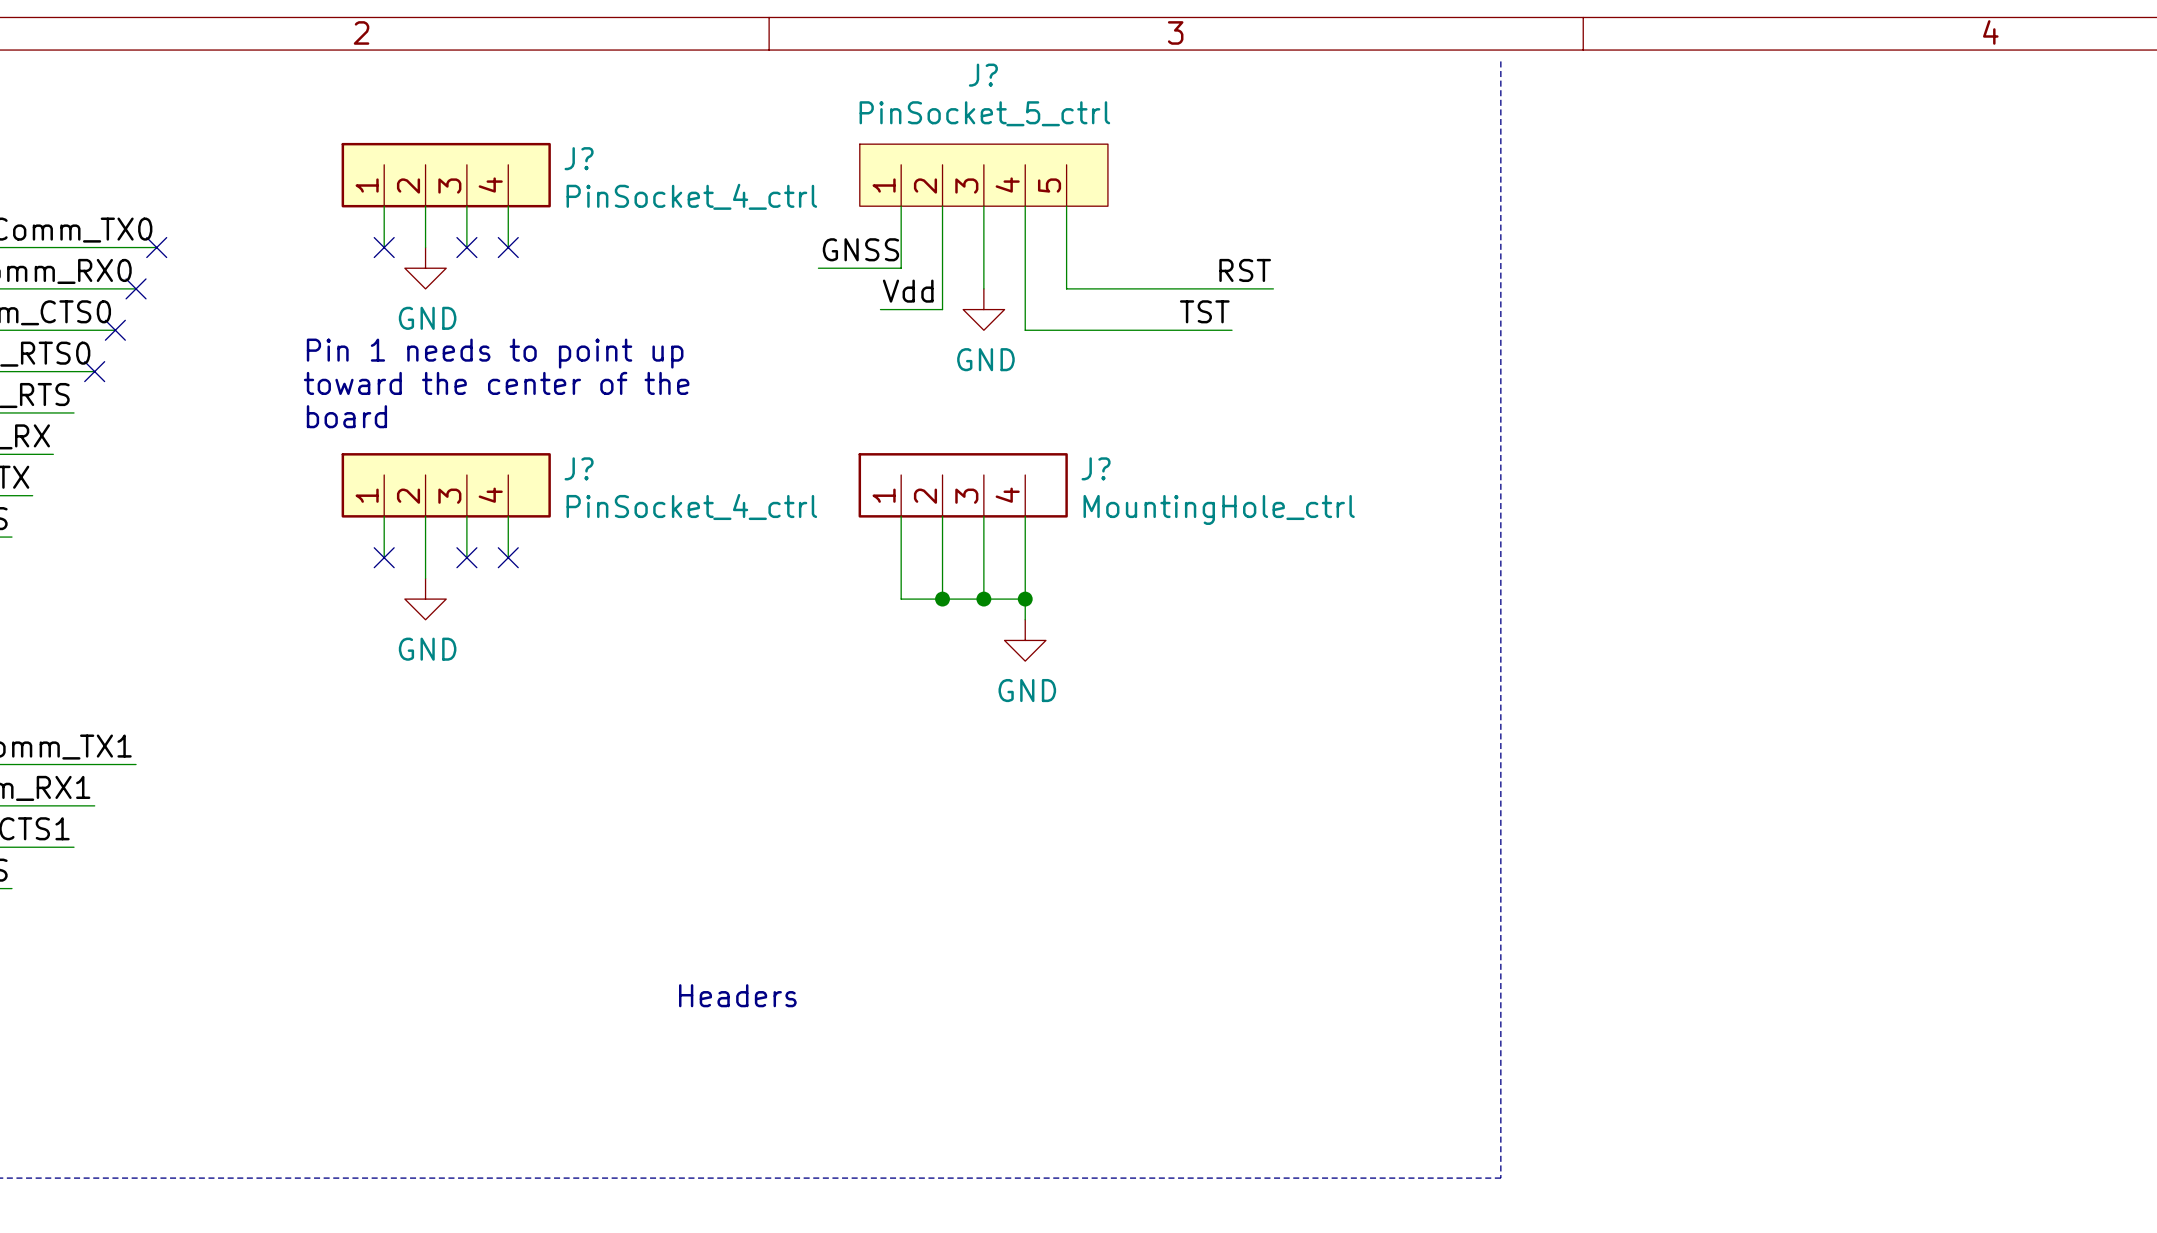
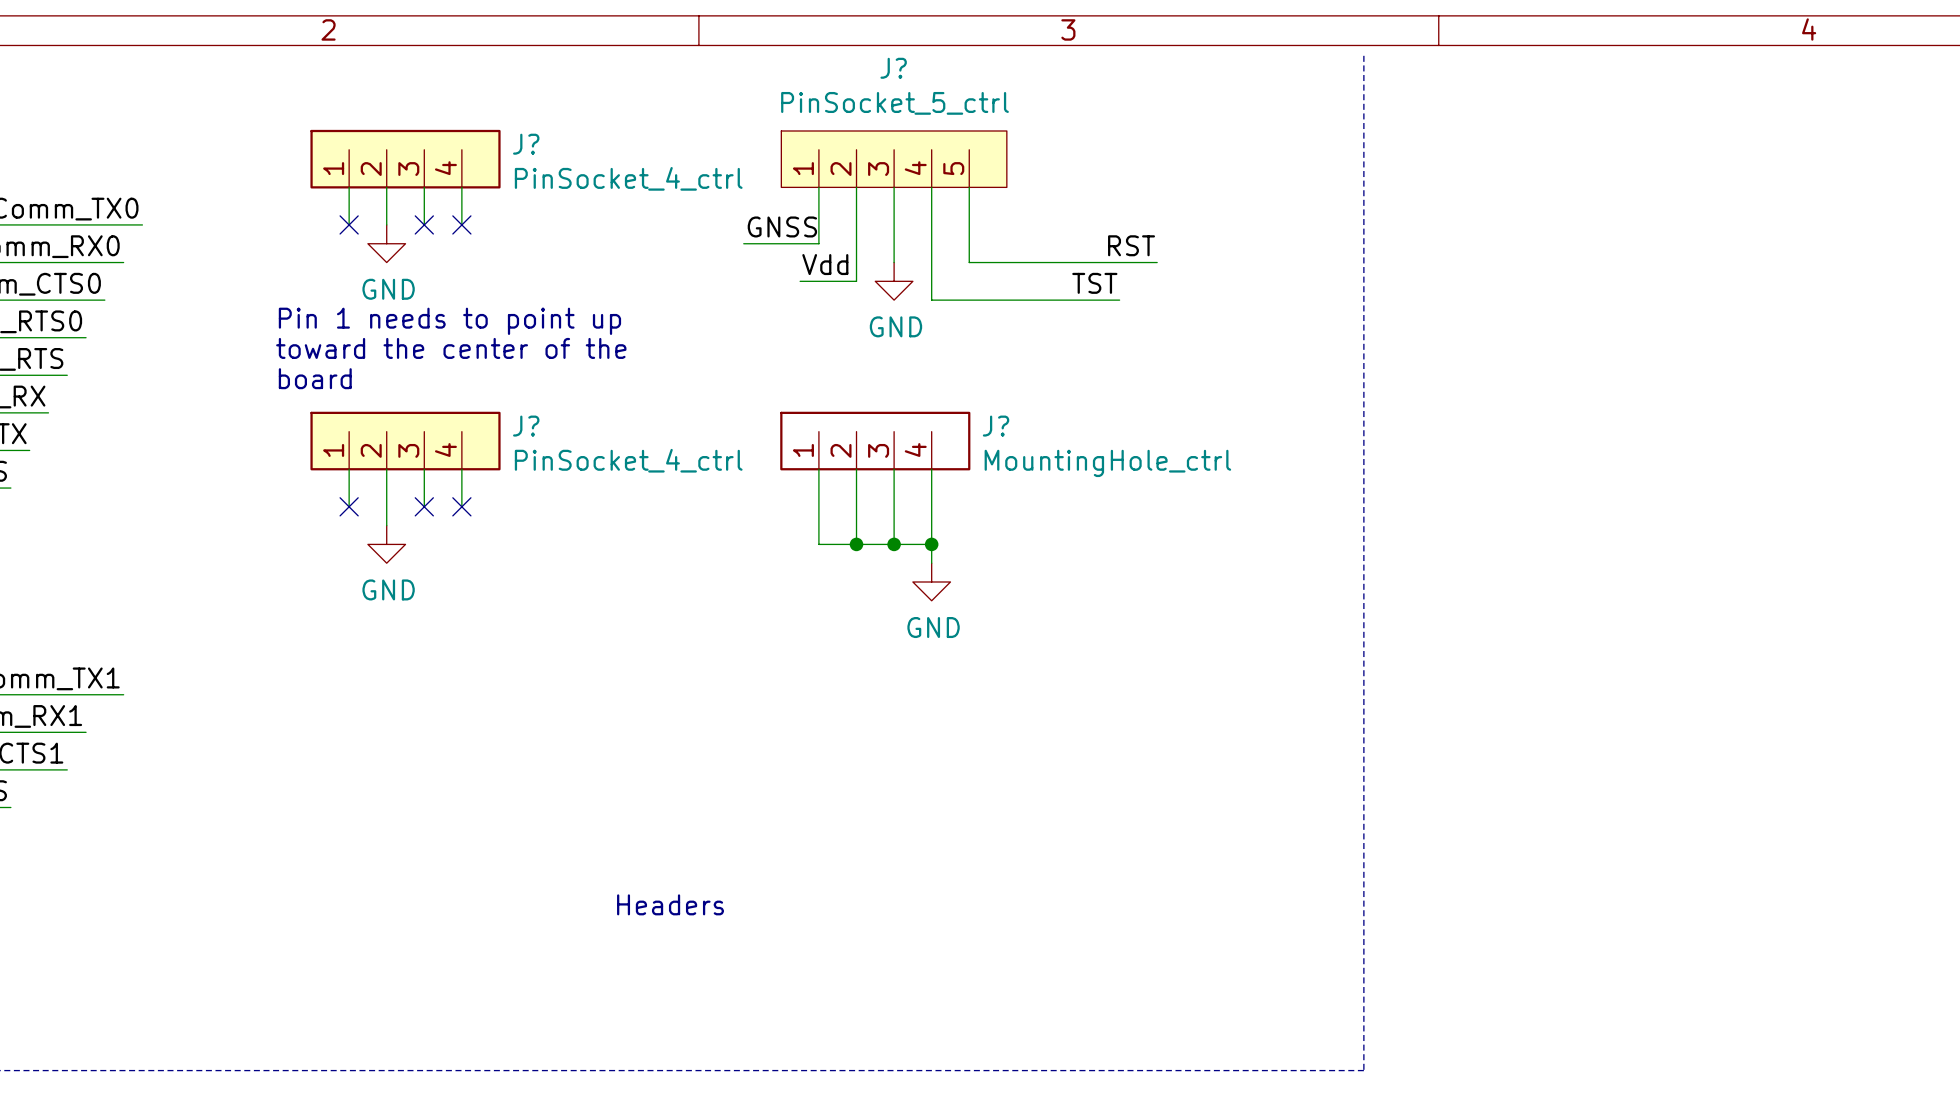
no-connect mark: (156, 247) -> none
no-connect mark: (136, 288) -> none
no-connect mark: (115, 330) -> none
no-connect mark: (94, 371) -> none

